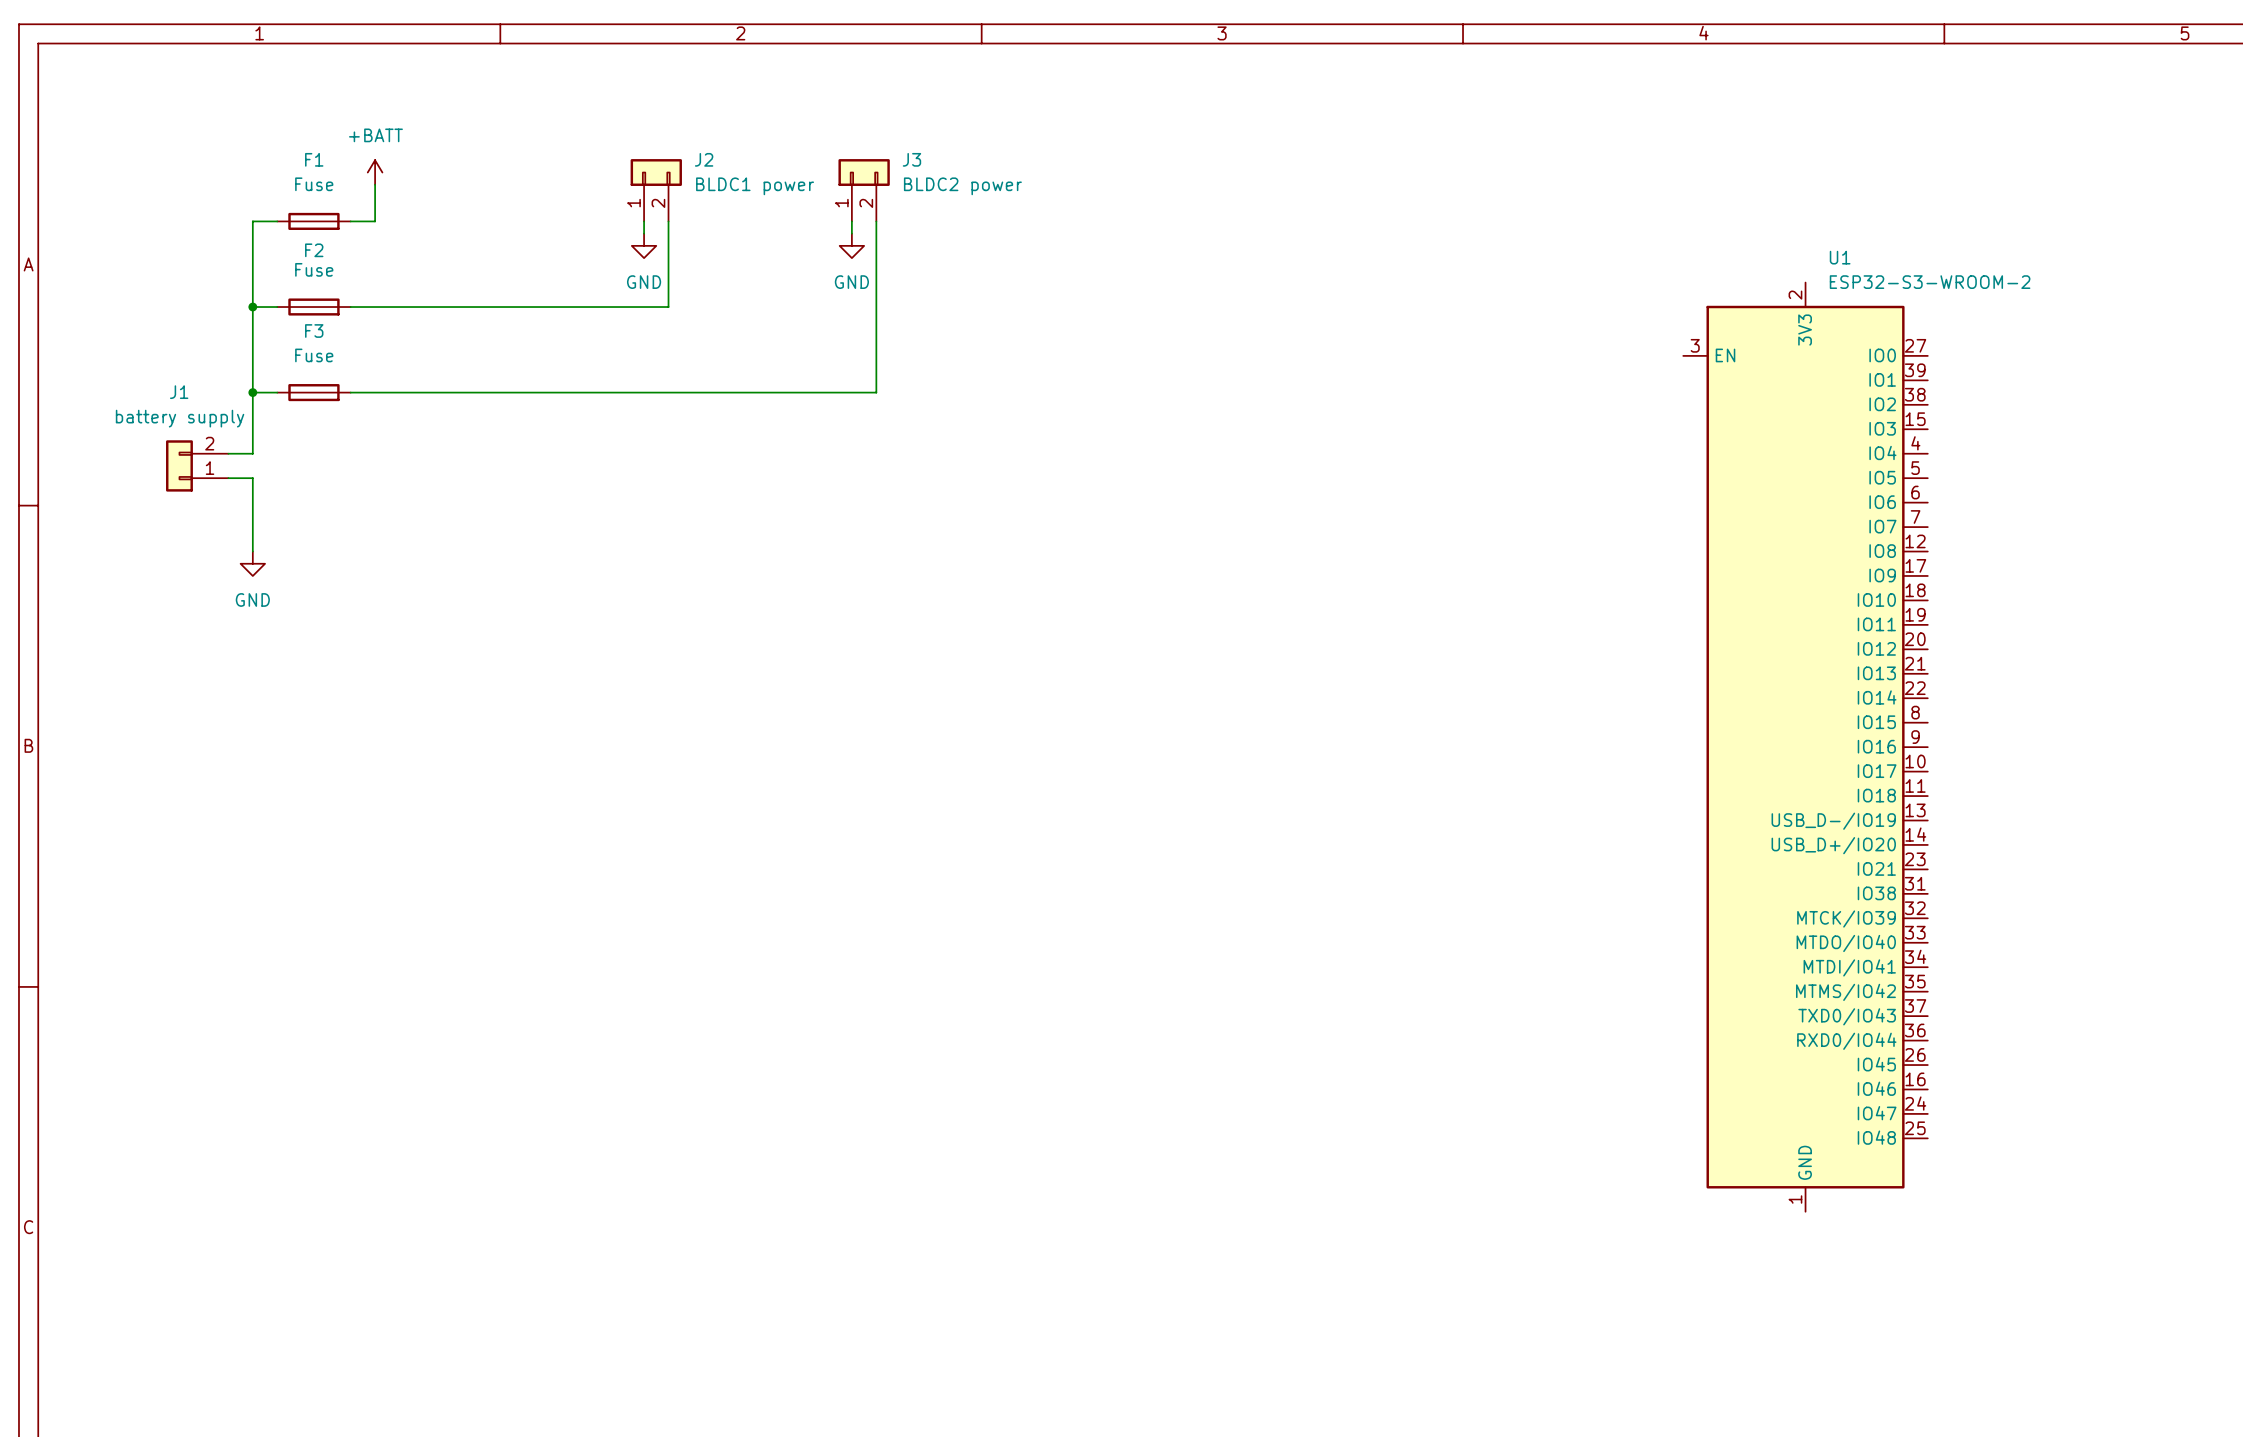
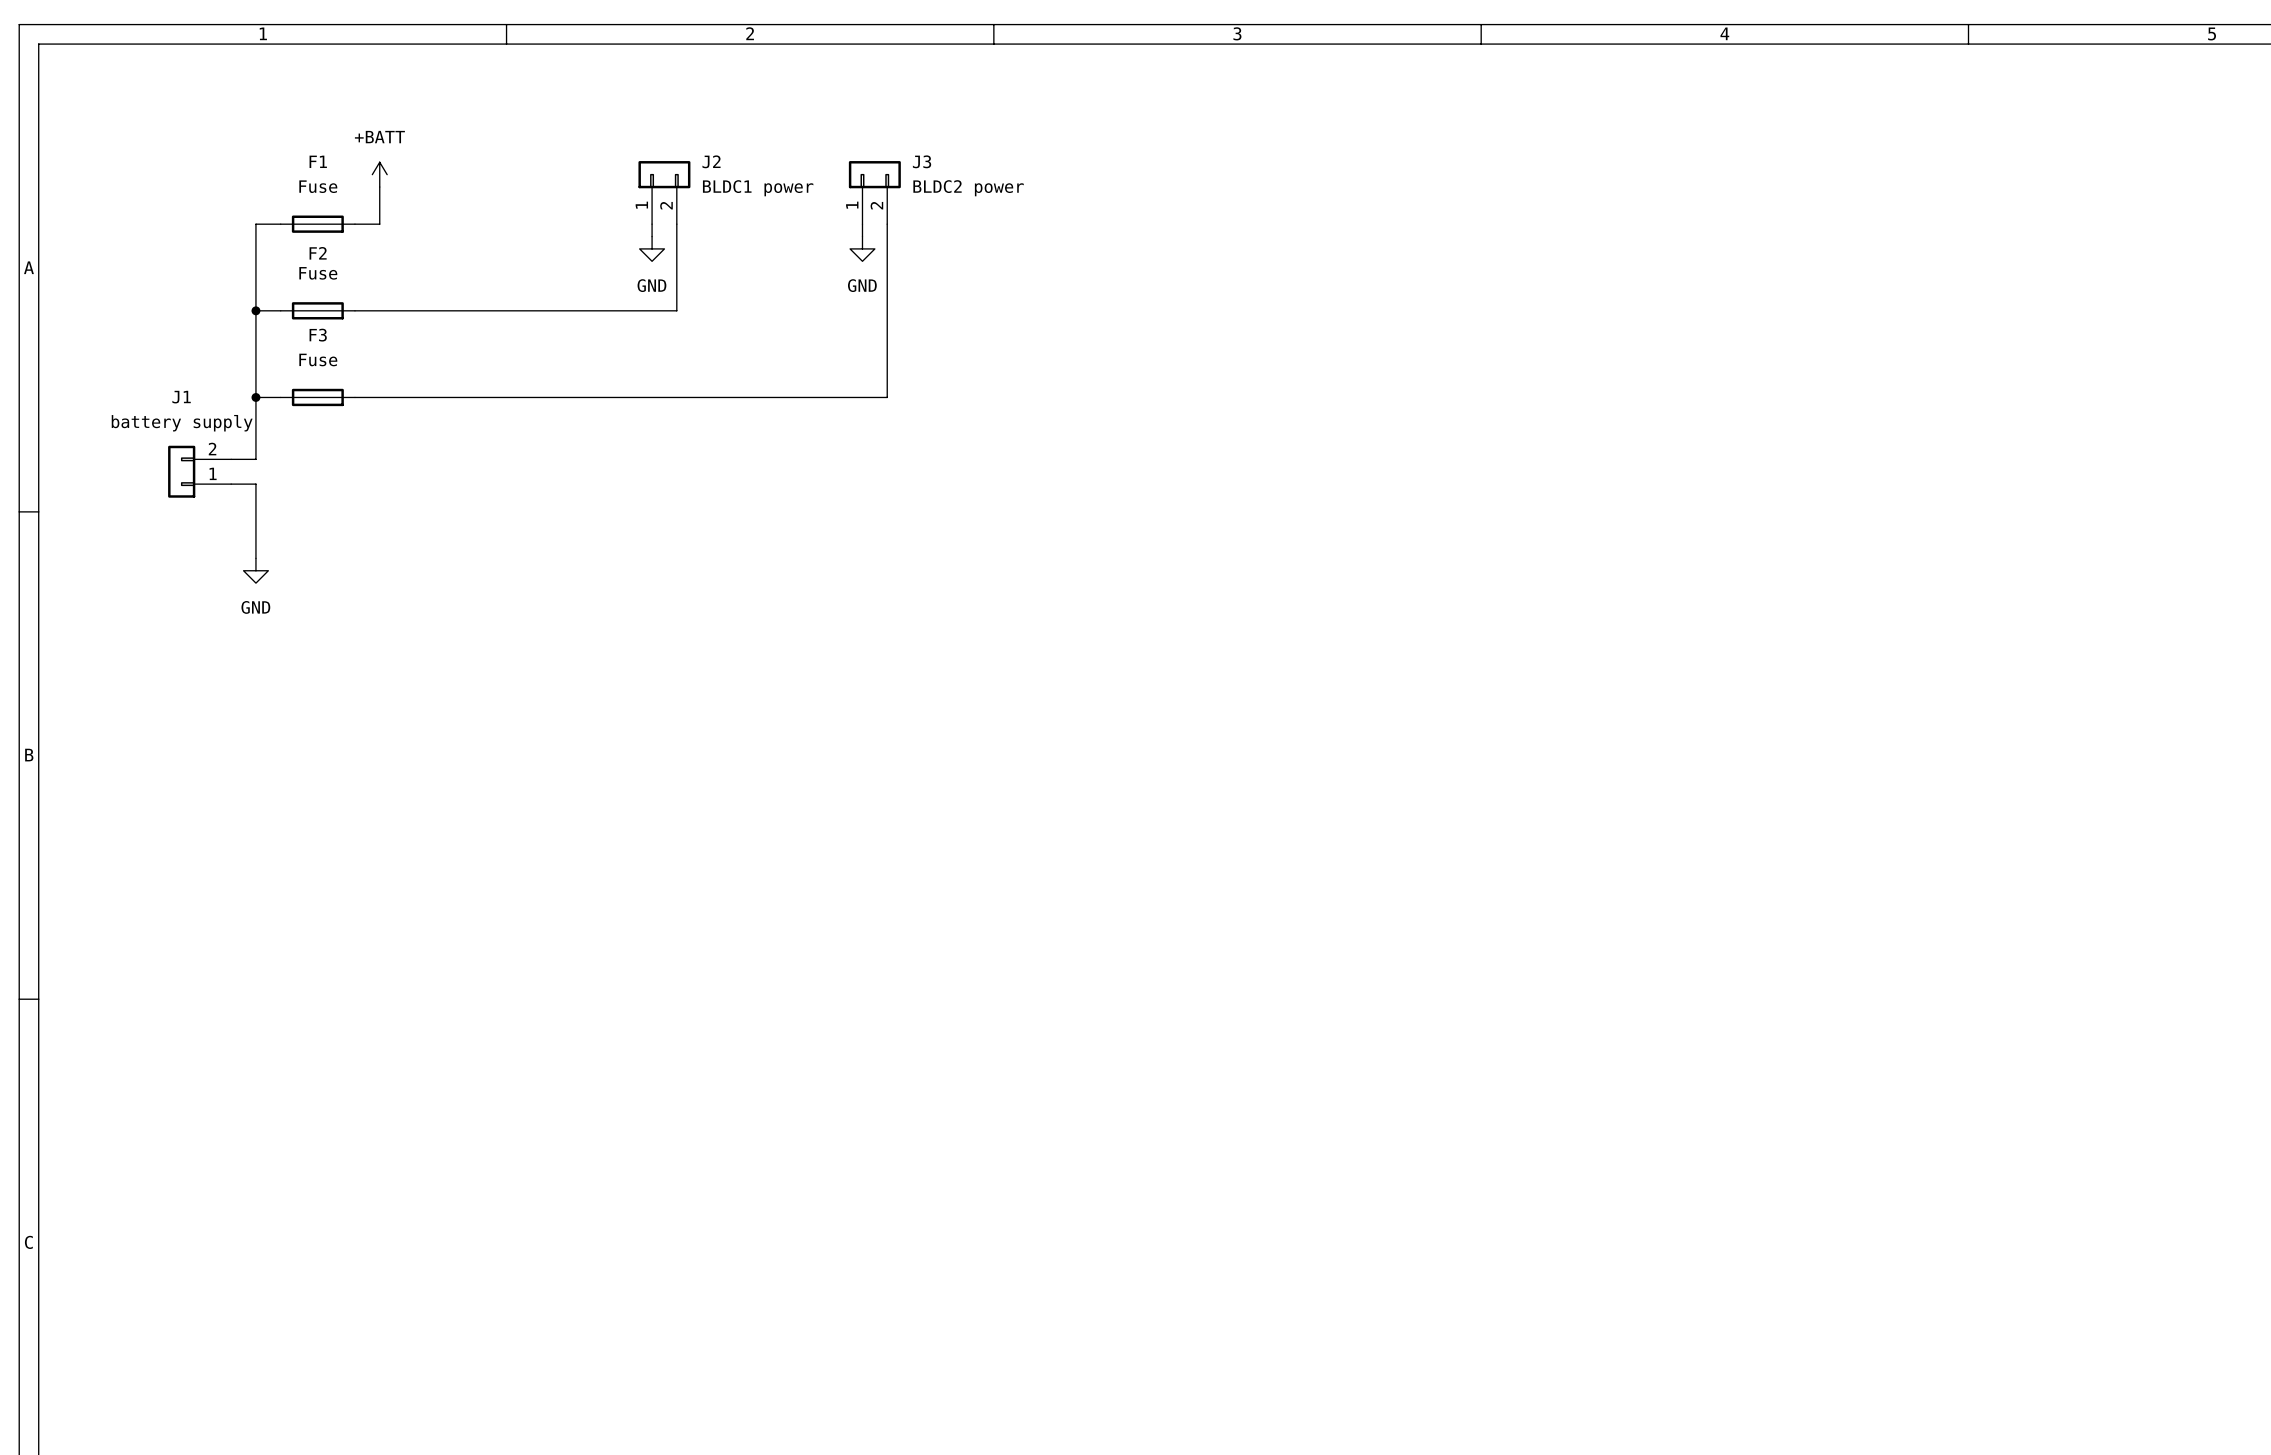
U1: ESP32-S3-WROOM-2 (1805, 747) -> none

